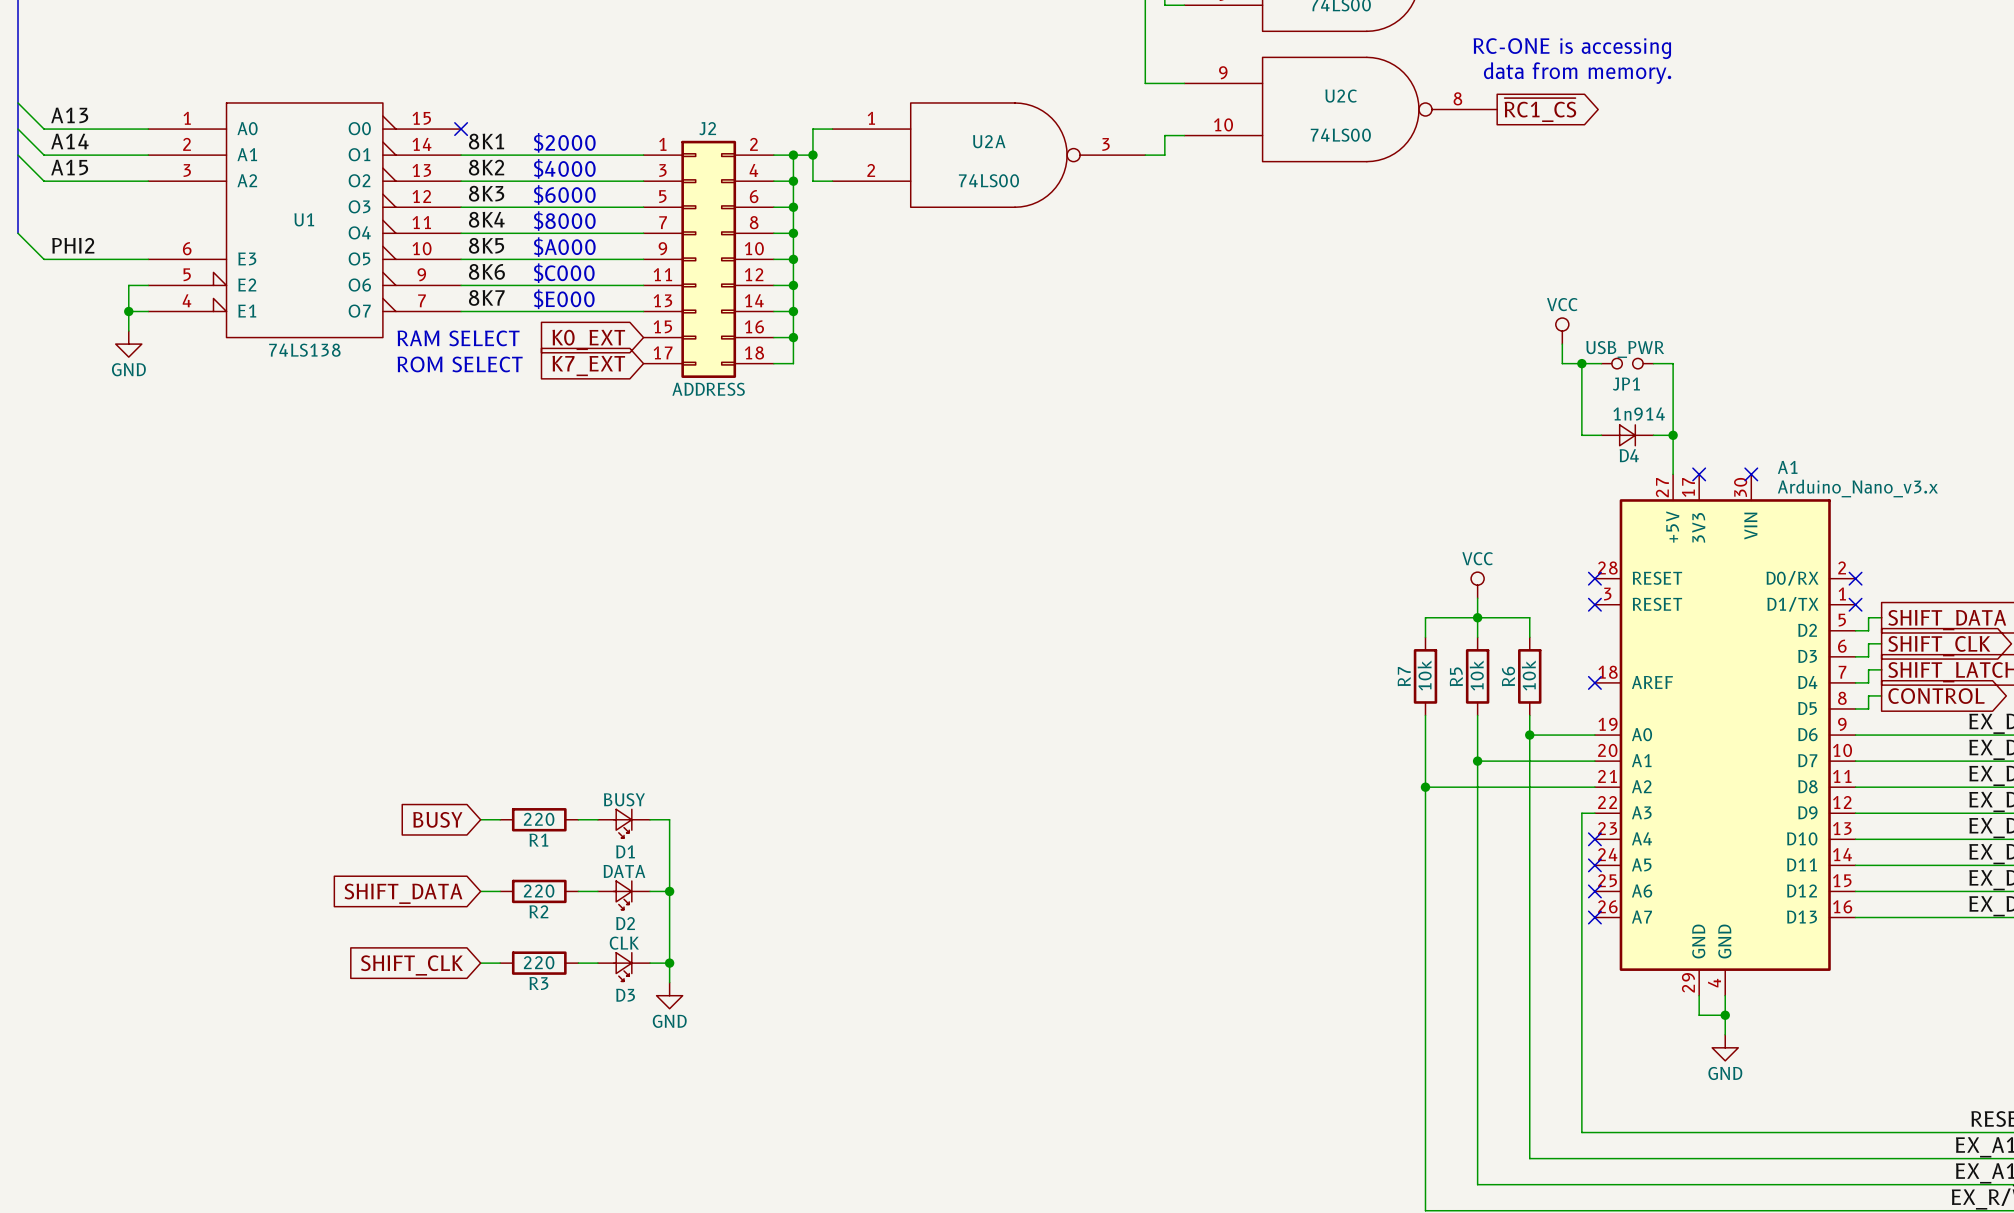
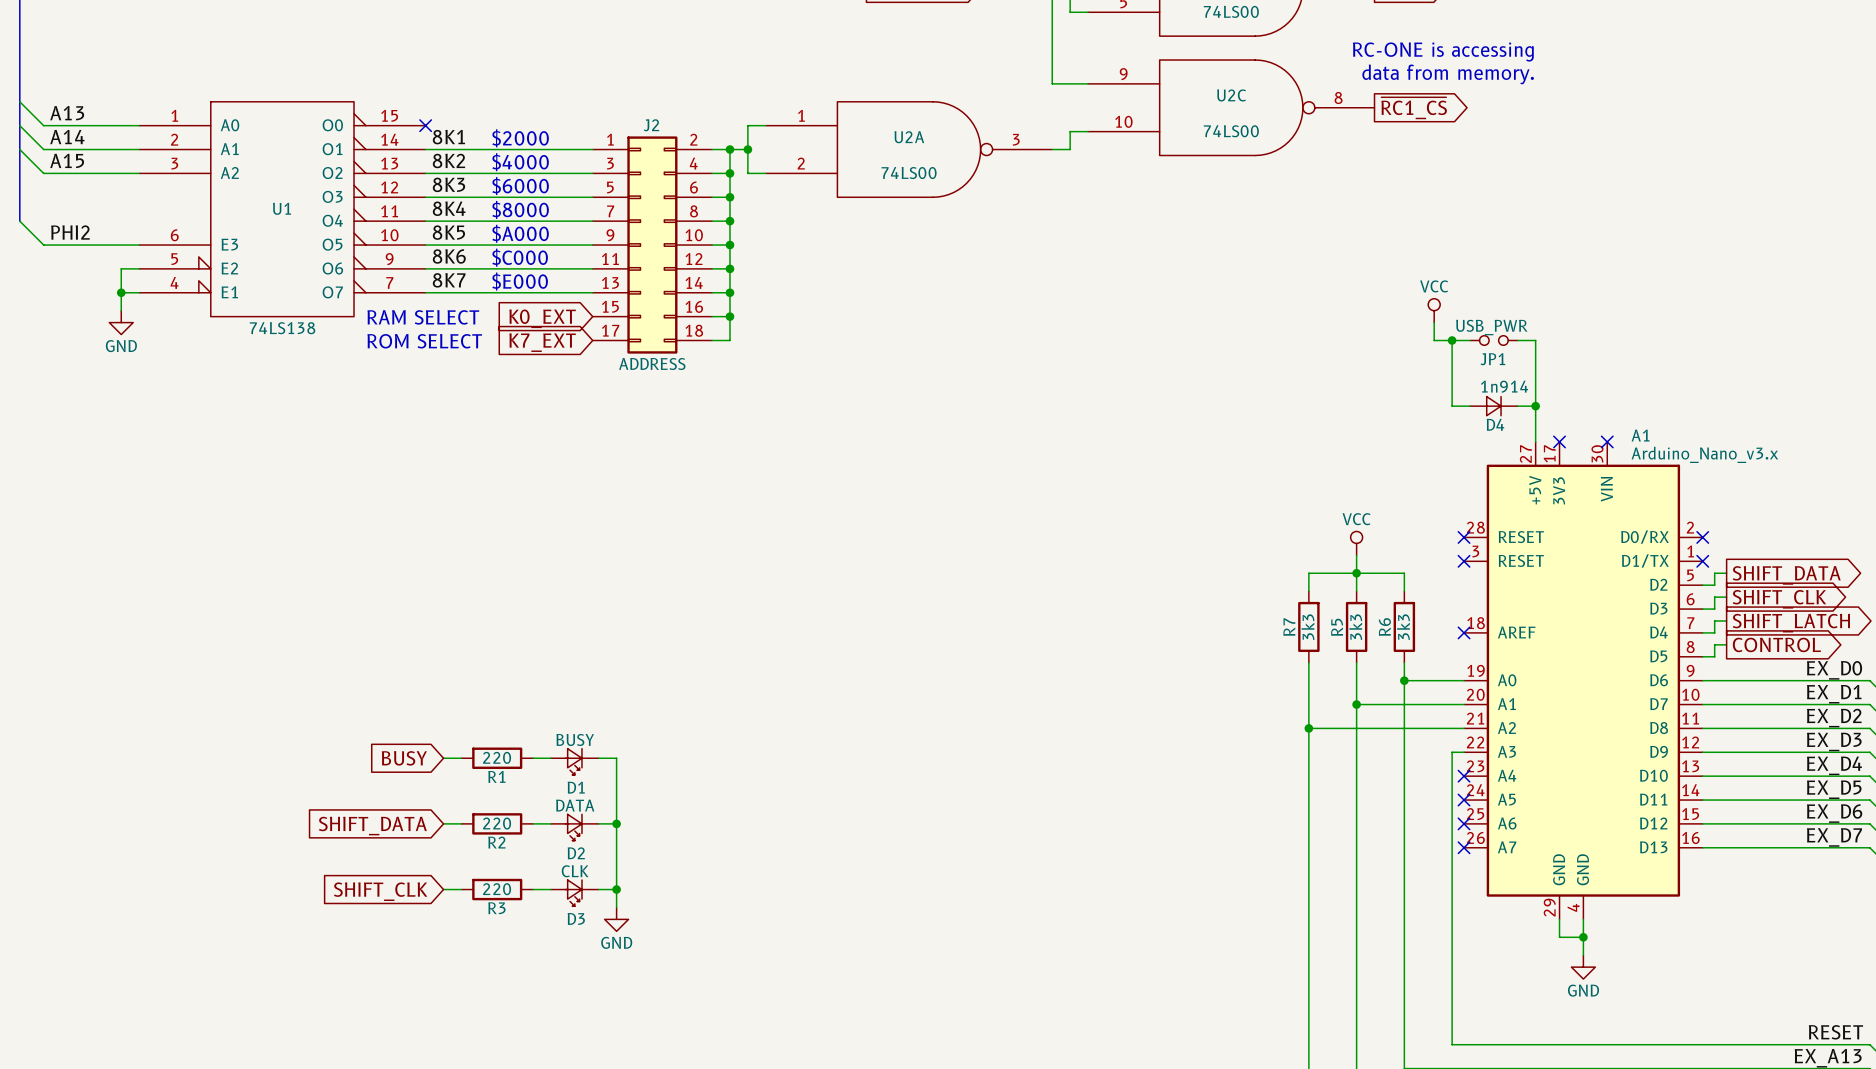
R7 value: 10k (1424, 675) -> 3k3 (1308, 627)
R5 value: 10k (1476, 675) -> 3k3 (1355, 627)
R6 value: 10k (1528, 675) -> 3k3 (1403, 627)

